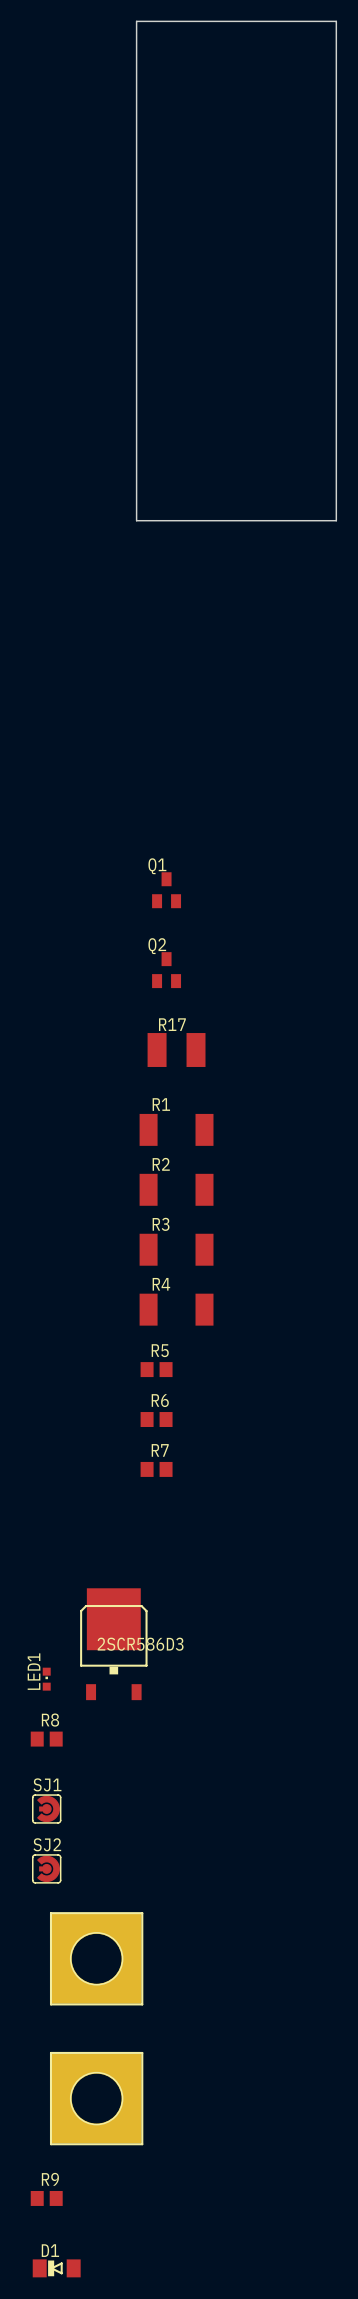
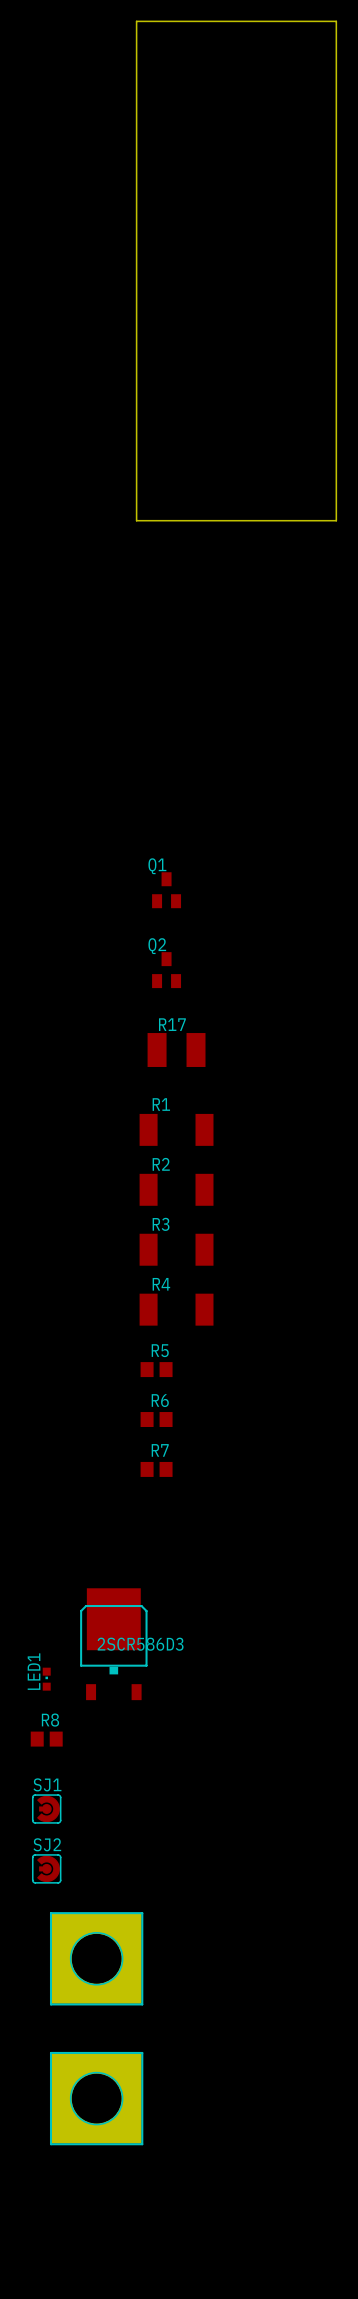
R9: (46, 2198) -> none
D1: (56, 2268) -> none

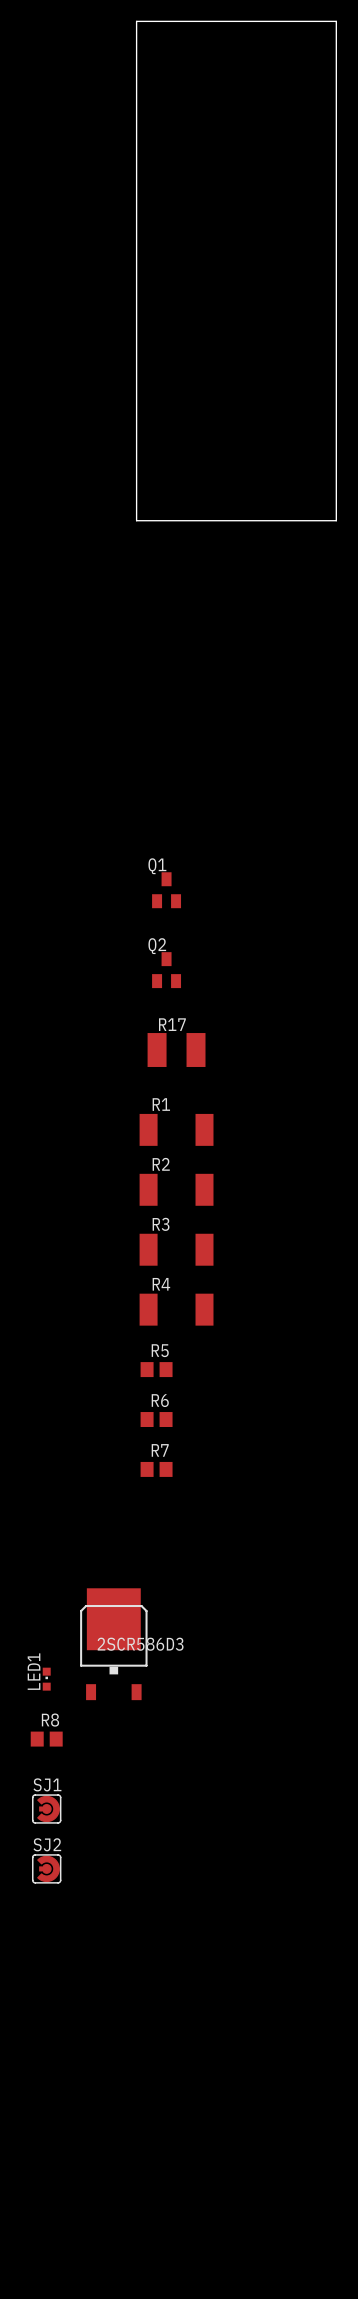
part: (96, 1958) -> none
part: (96, 2098) -> none

